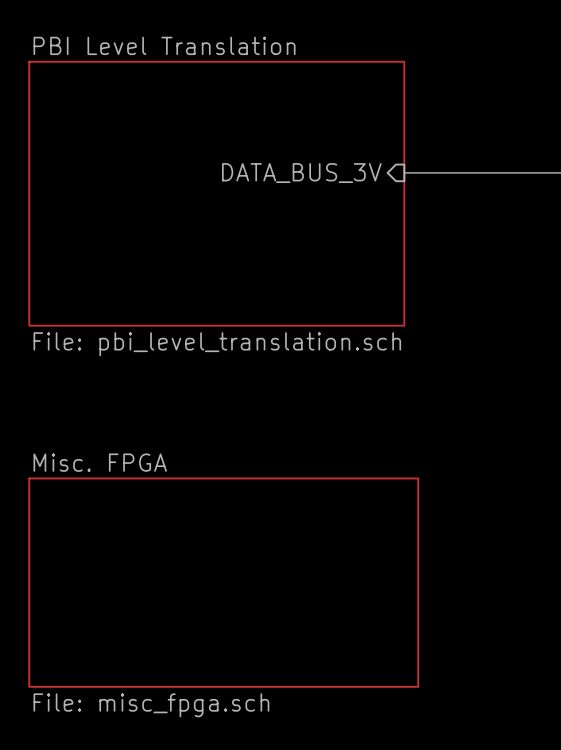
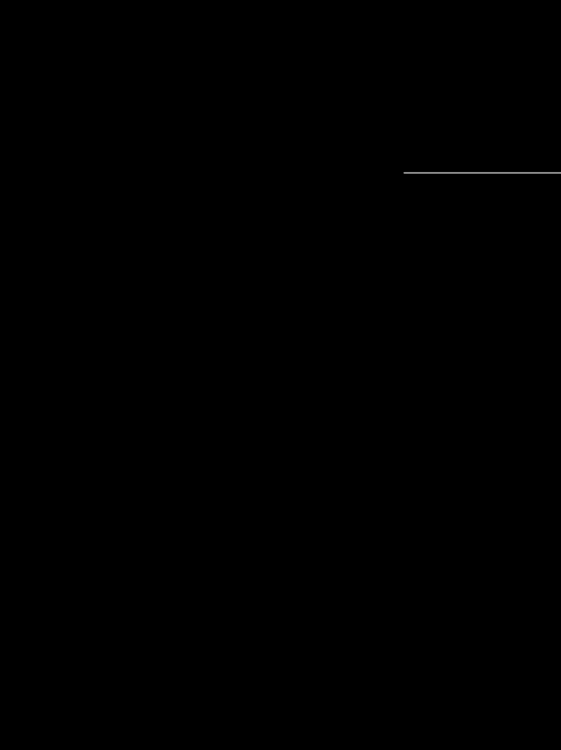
sheet pin: DATA_BUS_3V (301, 173) -> none
sheet PBI Level Translation: File: pbi_level_translation.sch (216, 193) -> none
sheet Misc. FPGA: File: misc_fpga.sch (223, 582) -> none

